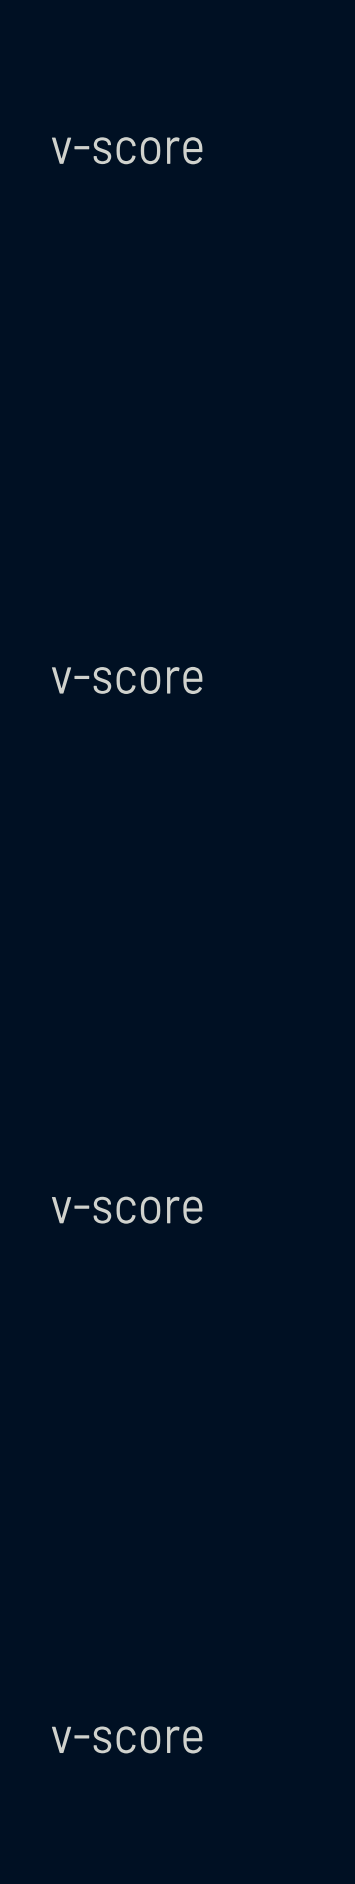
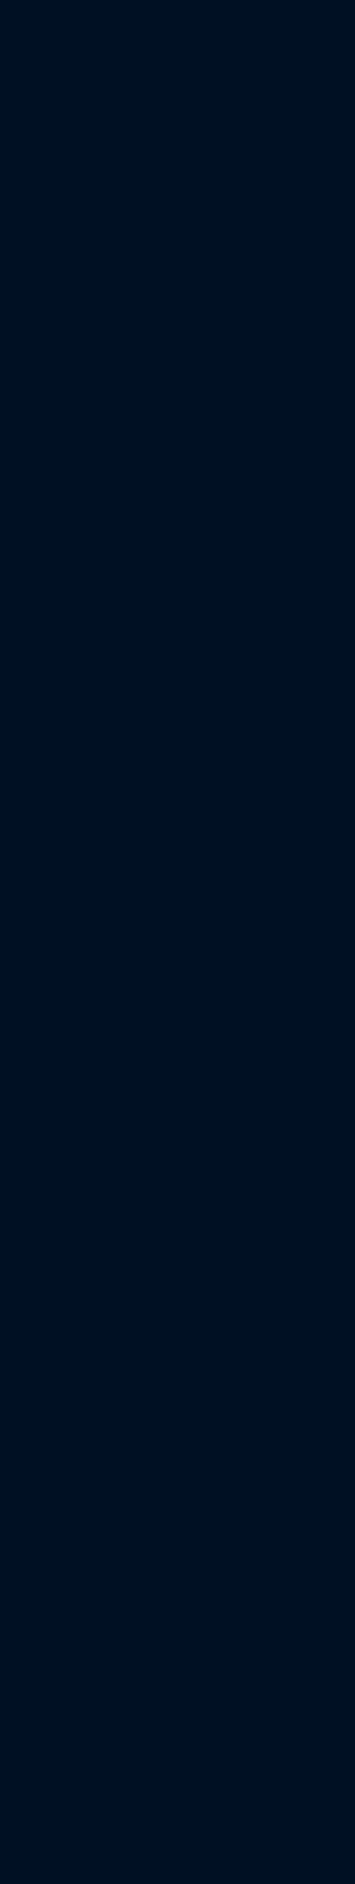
text: v-score (127, 150) -> none
text: v-score (127, 680) -> none
text: v-score (127, 1210) -> none
text: v-score (127, 1739) -> none

